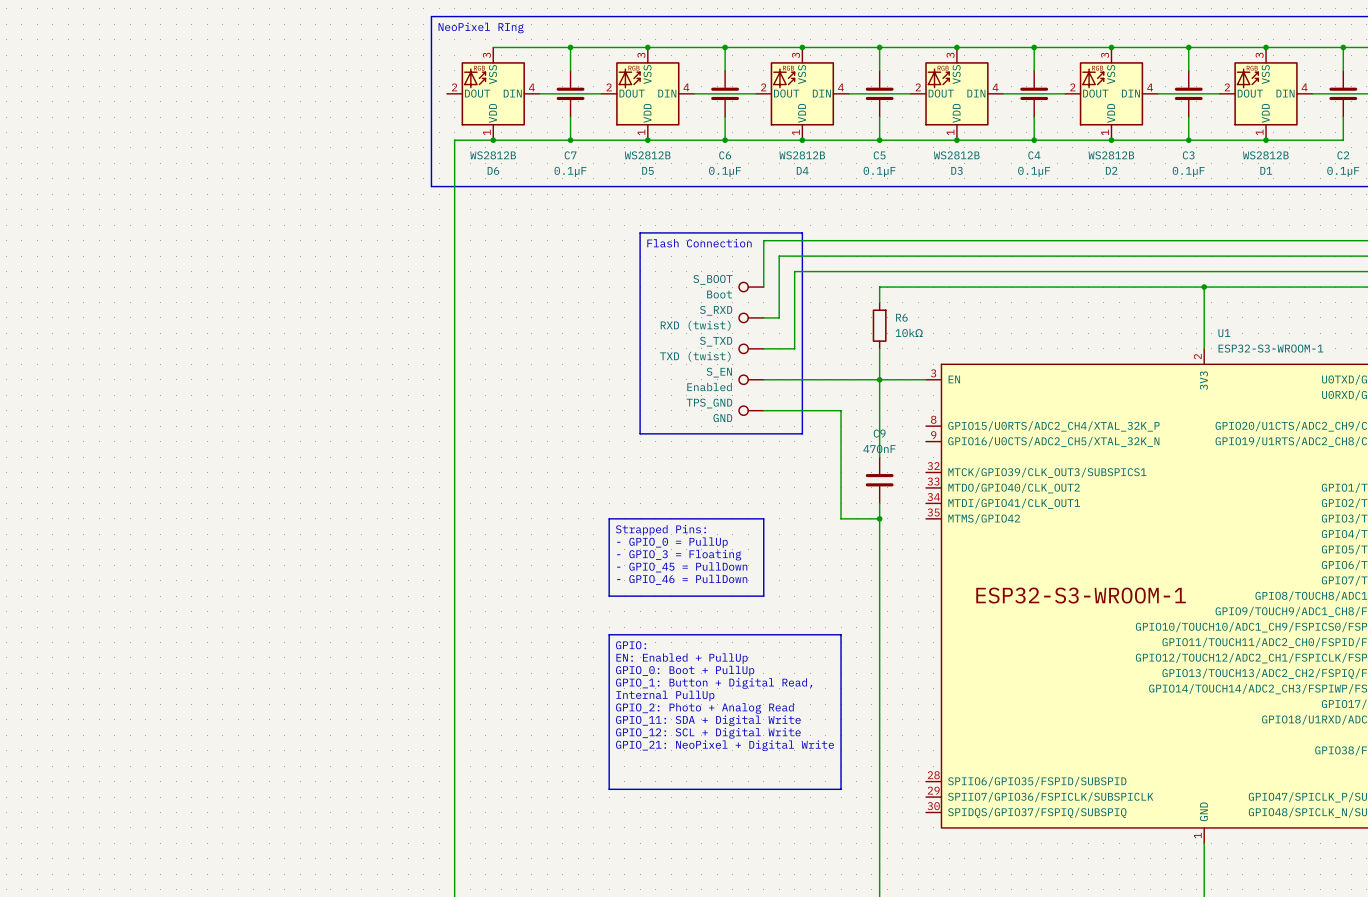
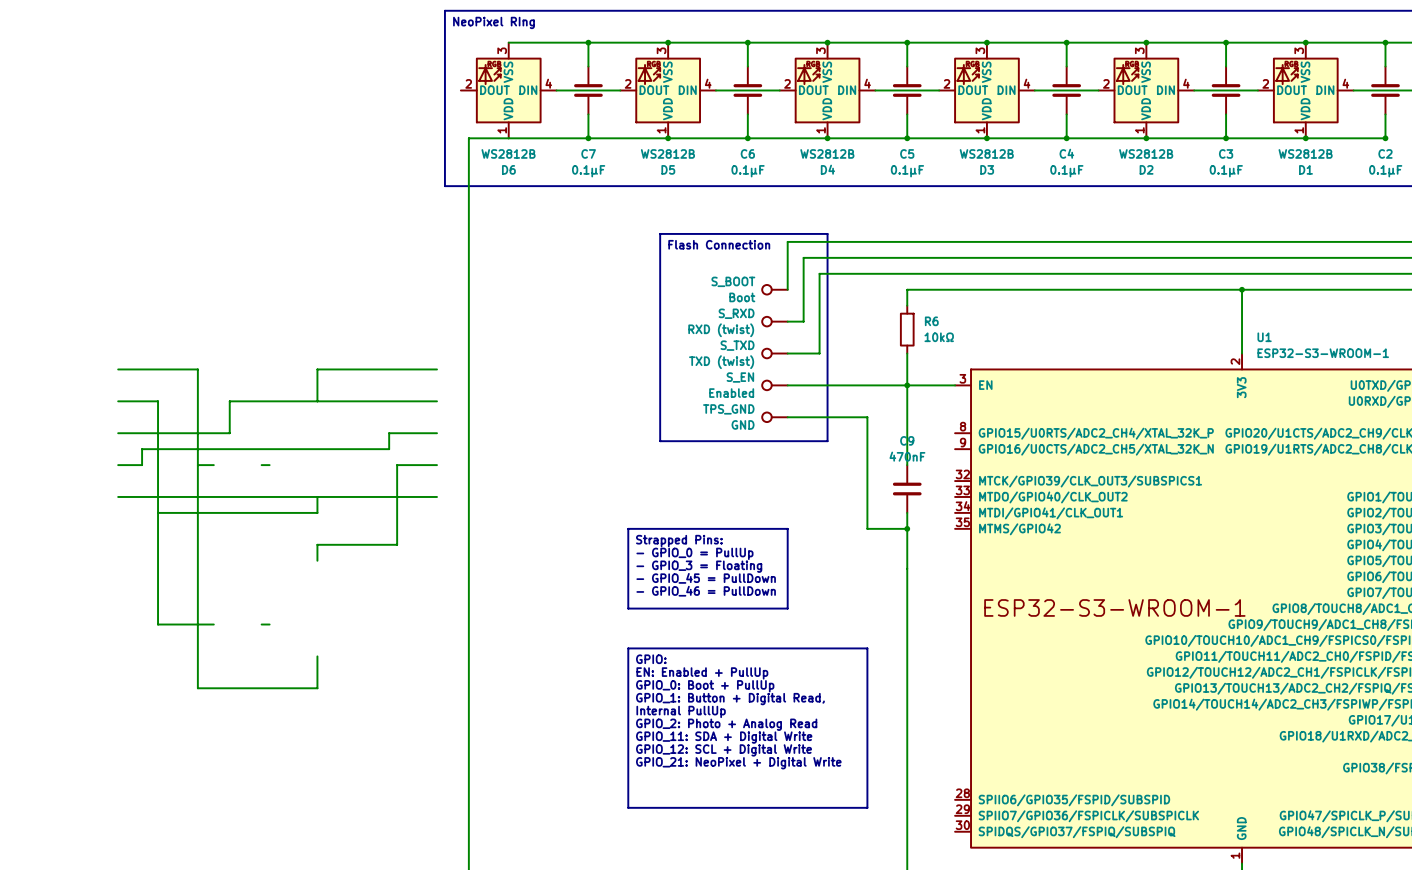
junction: (493, 140) -> none
junction: none -> (1385, 138)
wire: none -> (118, 369) (197, 369) (197, 688) (317, 688) (317, 656)
wire: none -> (436, 369) (317, 369) (317, 401)
wire: none -> (118, 401) (158, 401) (158, 624) (213, 624)
wire: none -> (436, 401) (229, 401) (229, 433) (118, 433)
wire: none -> (436, 433) (389, 433) (389, 449) (142, 449) (142, 465) (118, 465)
wire: none -> (197, 465) (213, 465)
wire: none -> (261, 465) (269, 465)
wire: none -> (436, 465) (397, 465) (397, 544) (317, 544) (317, 560)
wire: none -> (118, 496) (436, 496)
wire: none -> (317, 496) (317, 512) (158, 512)
wire: none -> (261, 624) (269, 624)

